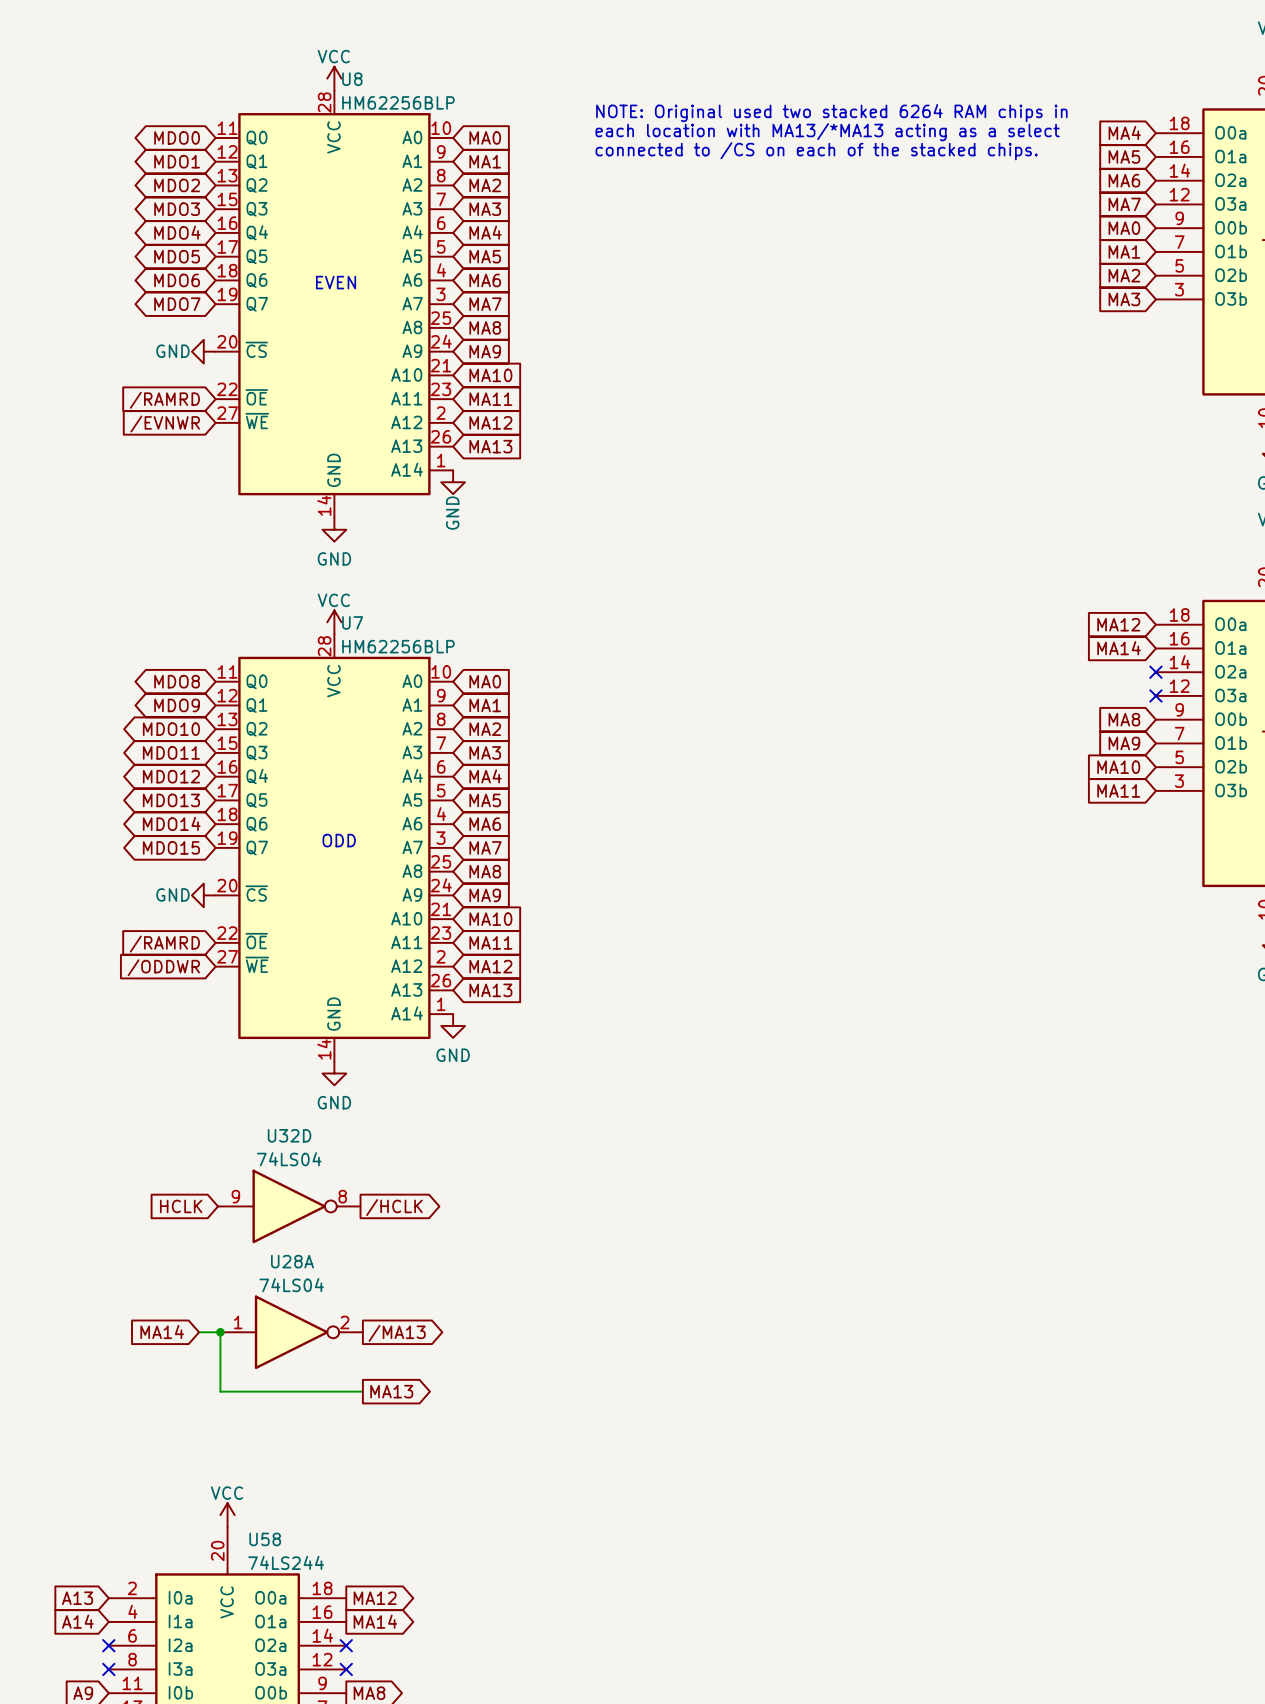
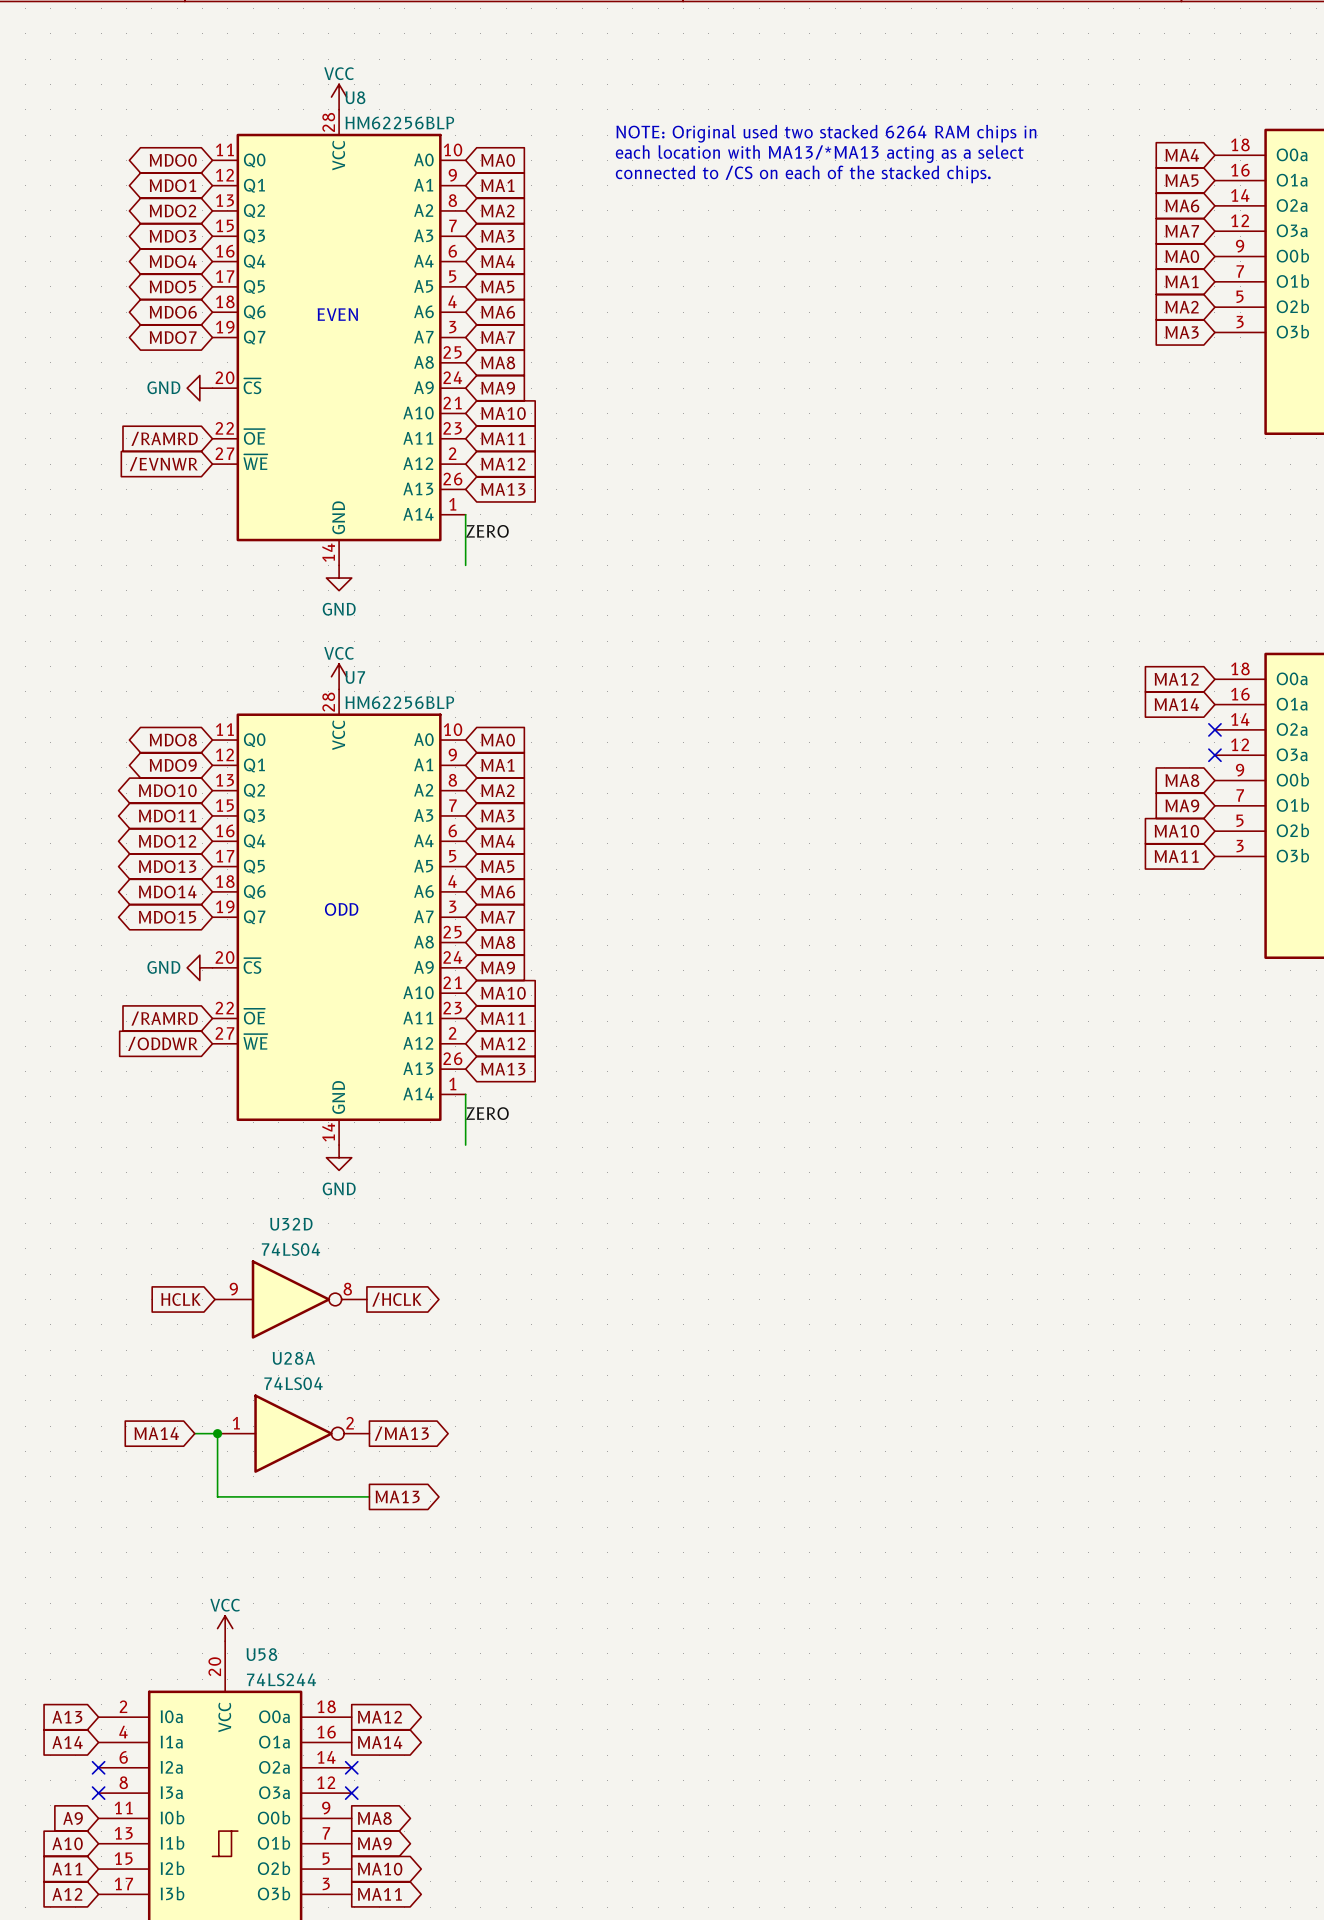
wire: none -> (465, 514) (465, 565)
power symbol: GND (453, 482) -> none
label: none -> ZERO (487, 531)
wire: none -> (465, 1094) (465, 1145)
power symbol: GND (453, 1025) -> none
label: none -> ZERO (487, 1113)

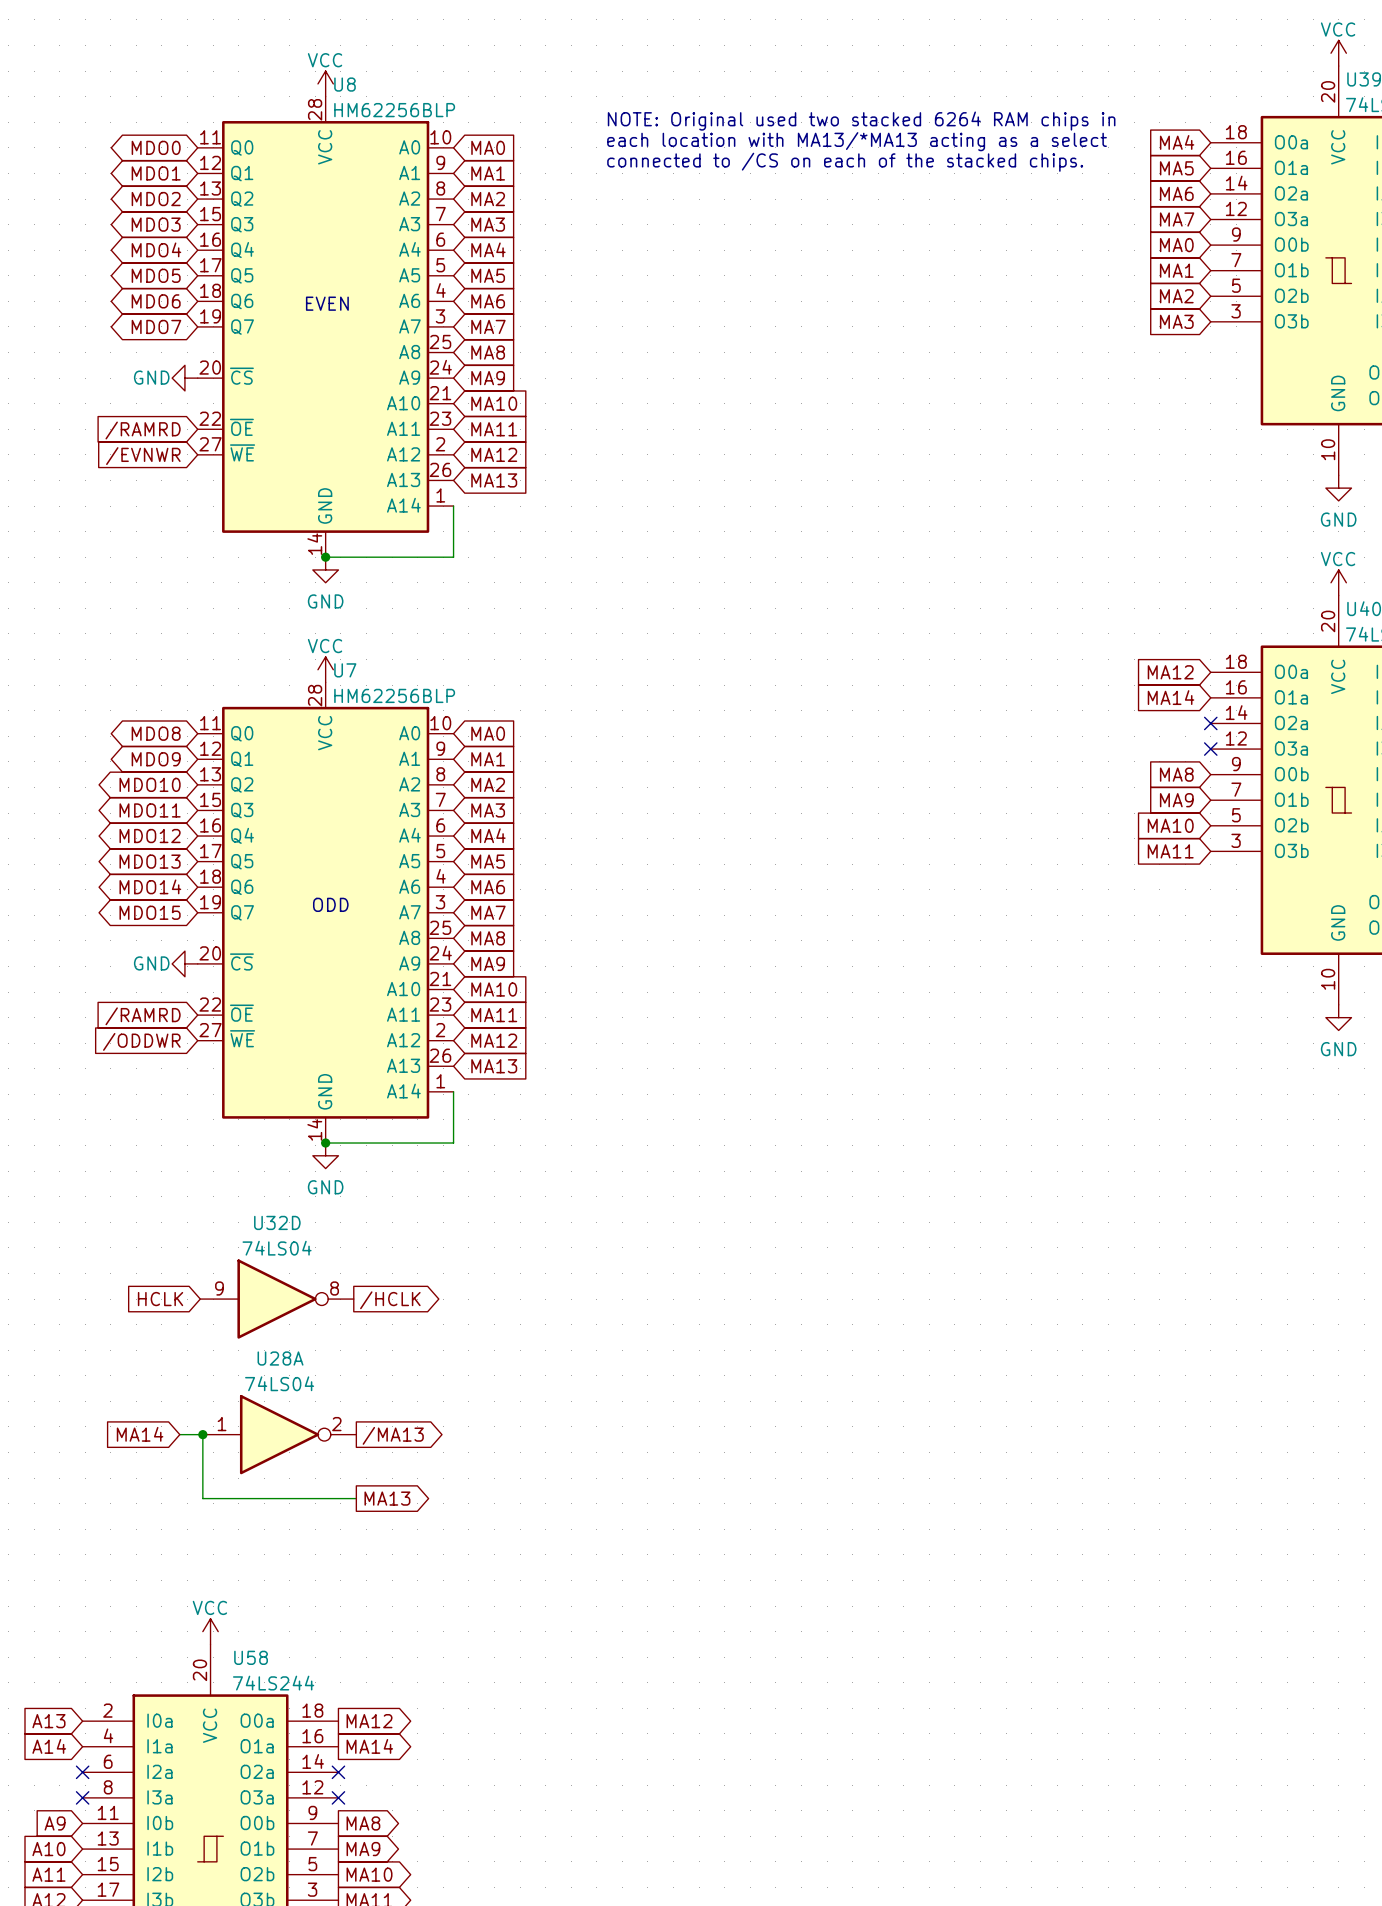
label: ZERO (487, 531) -> none
wire: none -> (325, 557) (453, 557)
junction: none -> (325, 557)
label: ZERO (487, 1113) -> none
wire: none -> (325, 1143) (453, 1143)
junction: none -> (325, 1143)

